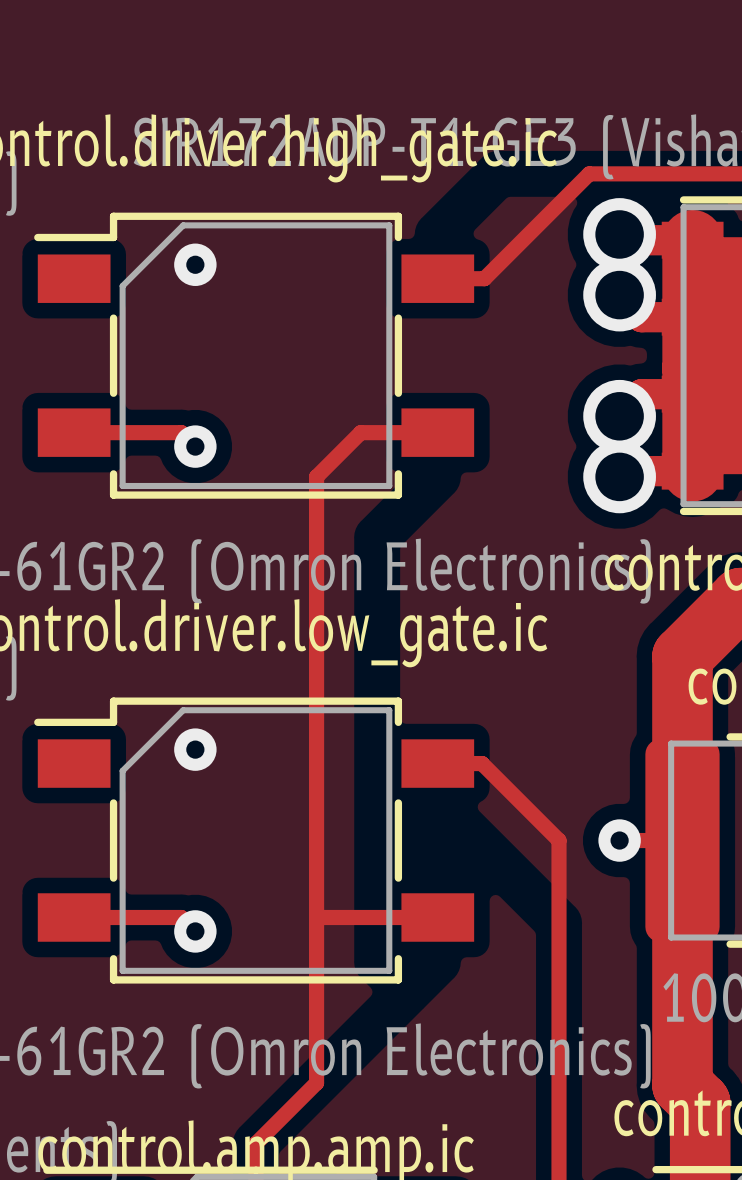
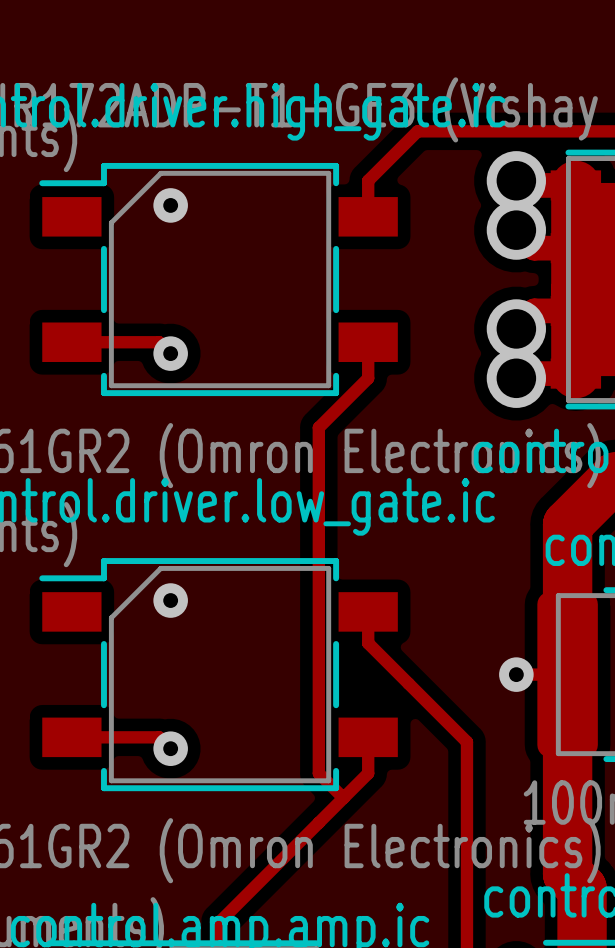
track: (589, 173) (484, 278) (437, 278) -> (491, 131) (417, 131) (368, 180) (368, 216)
track: (437, 432) (360, 432) (316, 476) (316, 1082) -> (368, 342) (368, 378) (318, 427) (318, 773) (343, 798)
track: (437, 763) (482, 763) (559, 840) (559, 923) -> (368, 611) (368, 643) (466, 742)
track: (316, 917) (437, 917) -> (269, 872) (368, 773) (368, 737)

